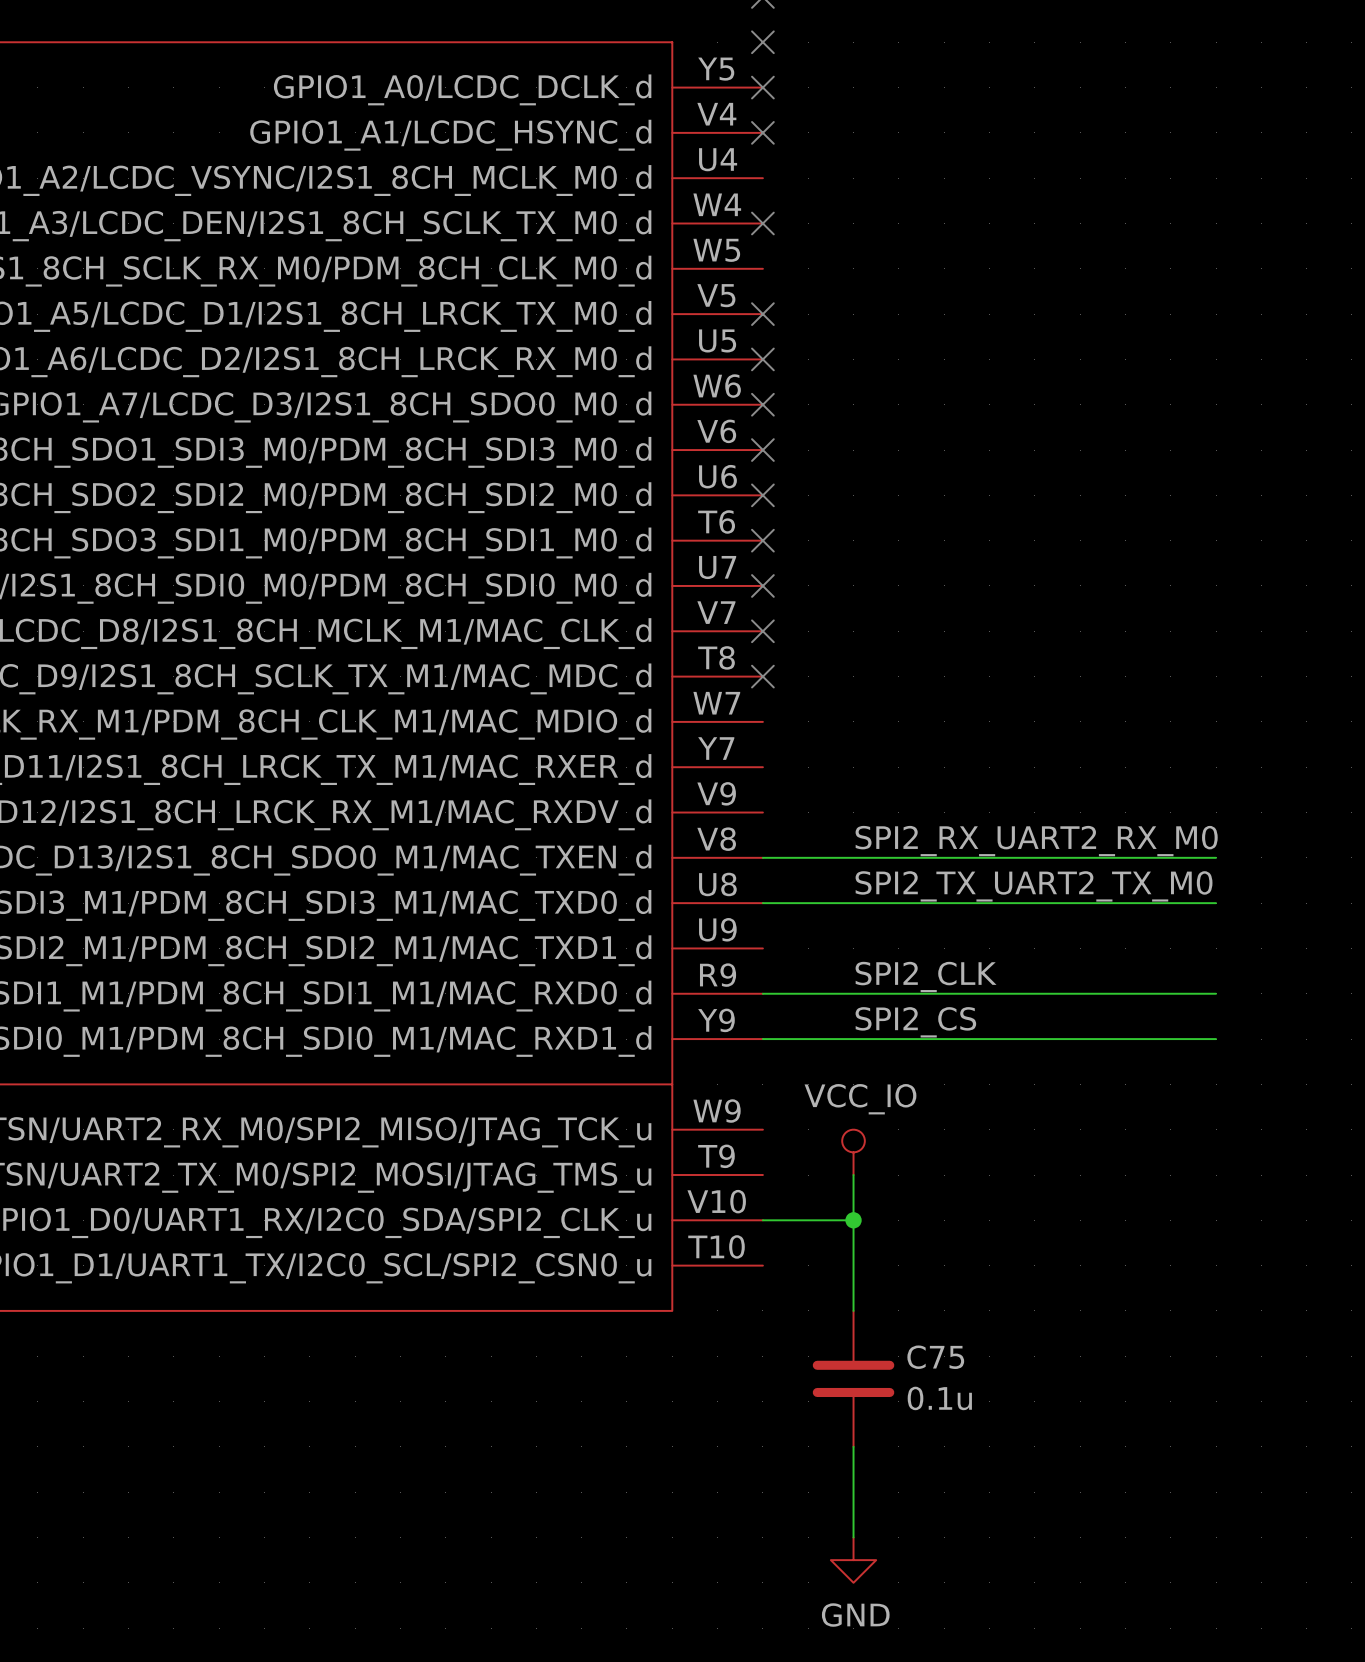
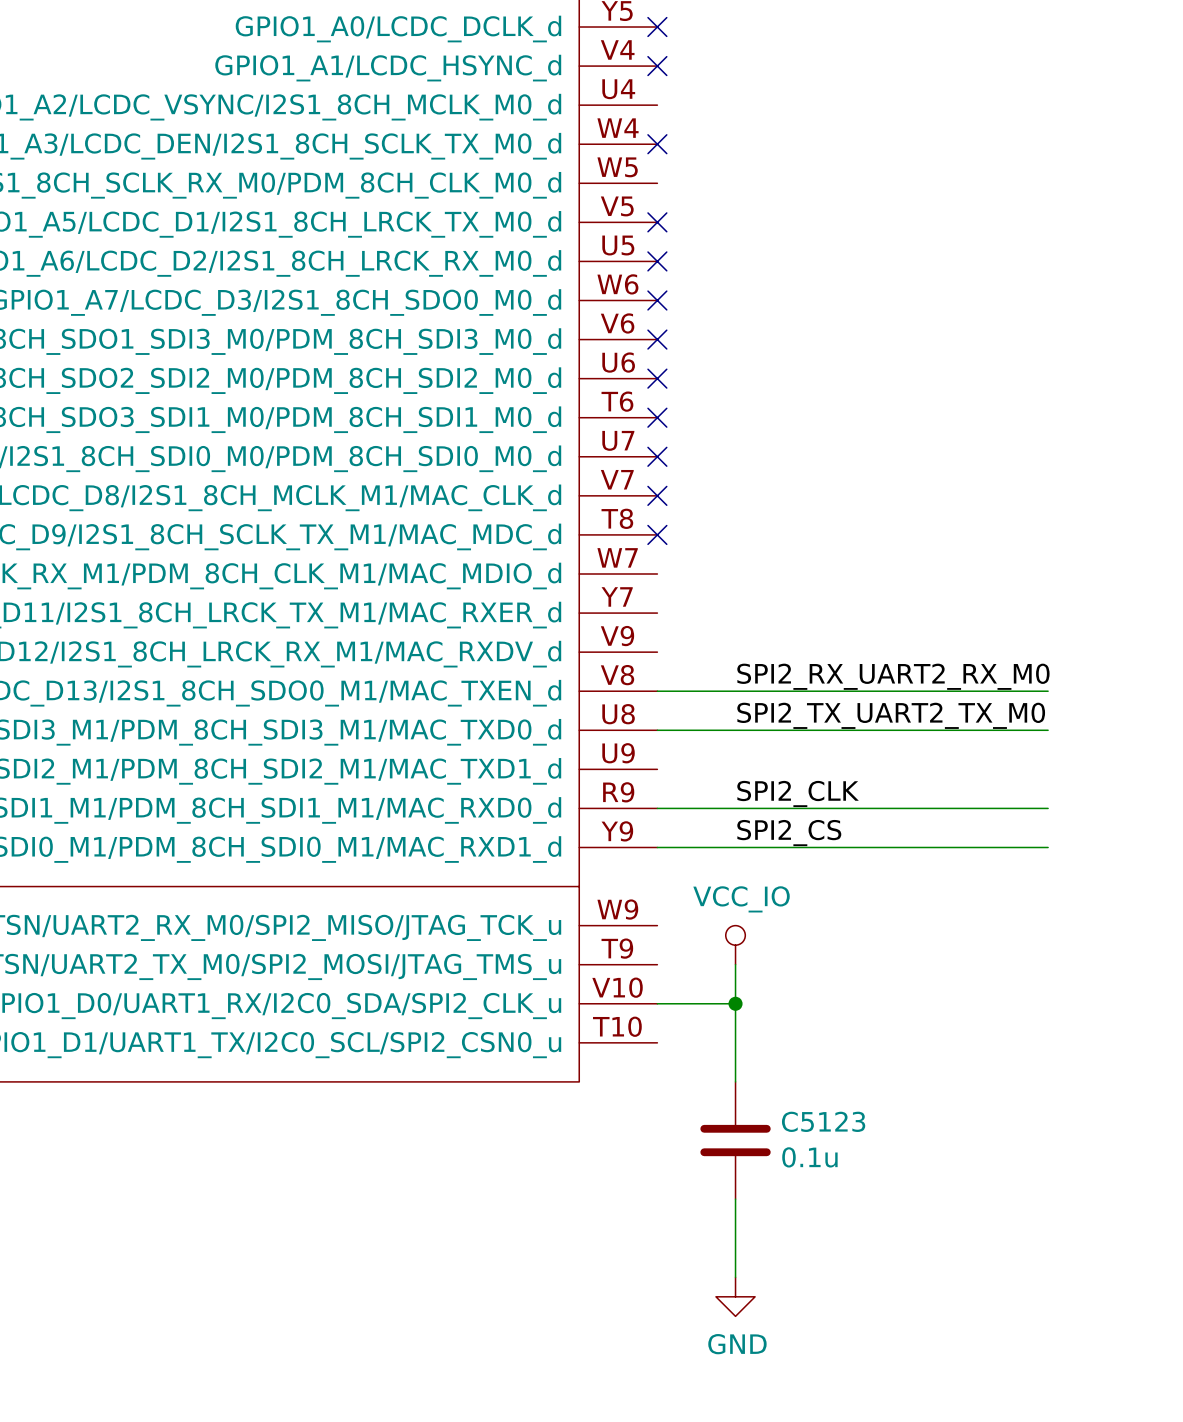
C75 name: C75 (935, 1357) -> C5123 (823, 1121)

